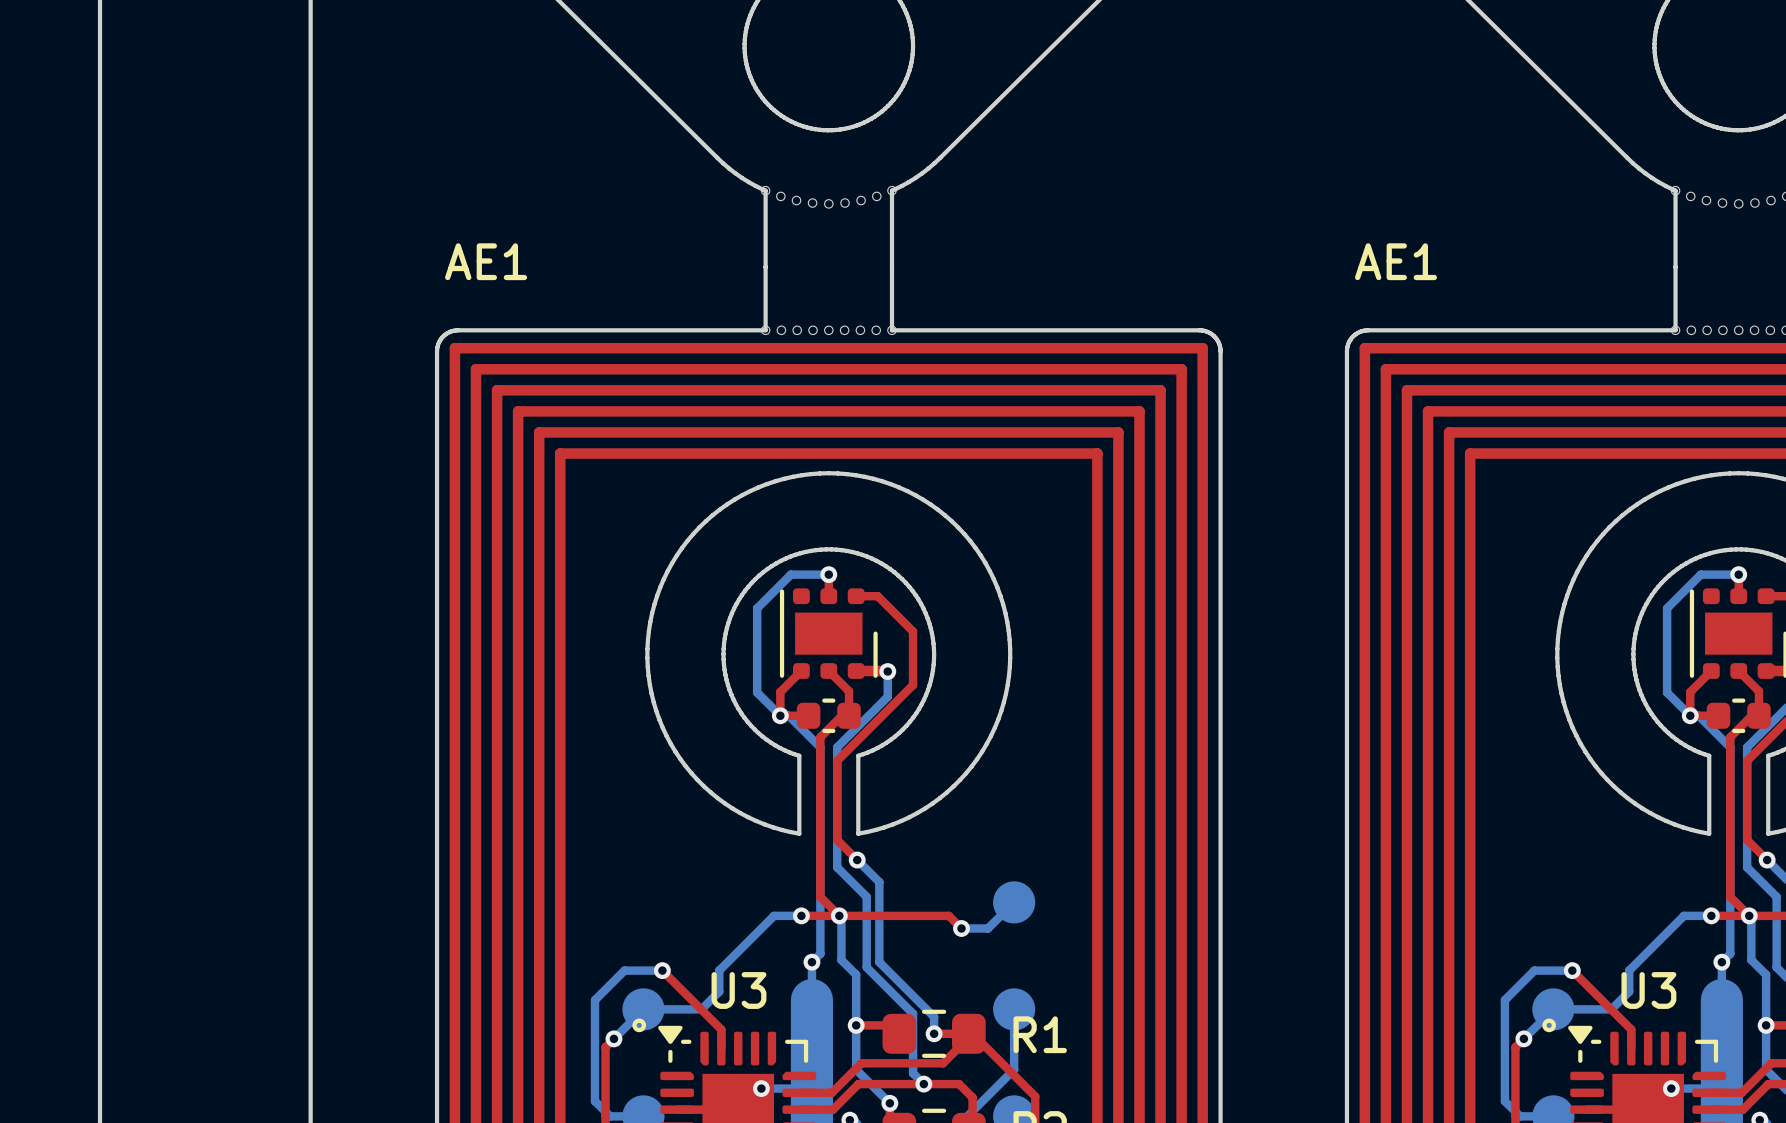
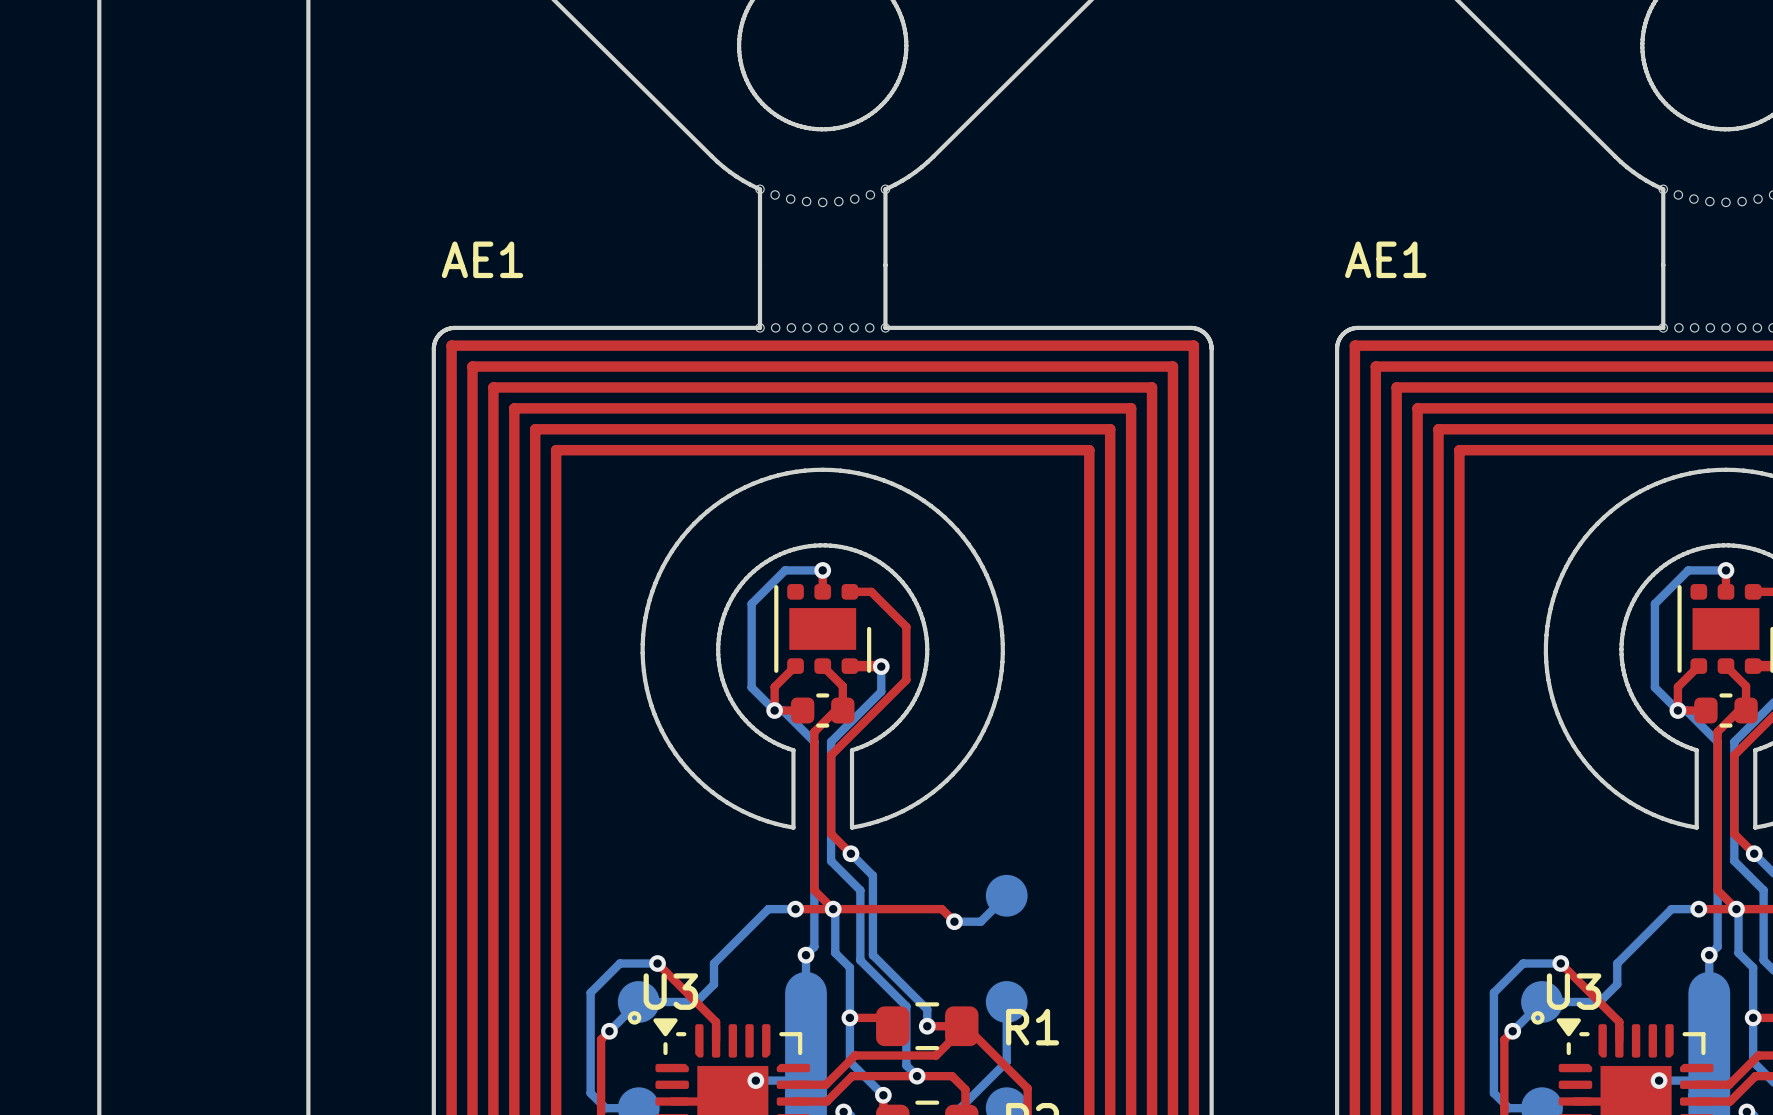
U3 name position: U3 (738, 990) -> U3 (670, 991)
U3 name position: U3 (1648, 990) -> U3 (1574, 991)

